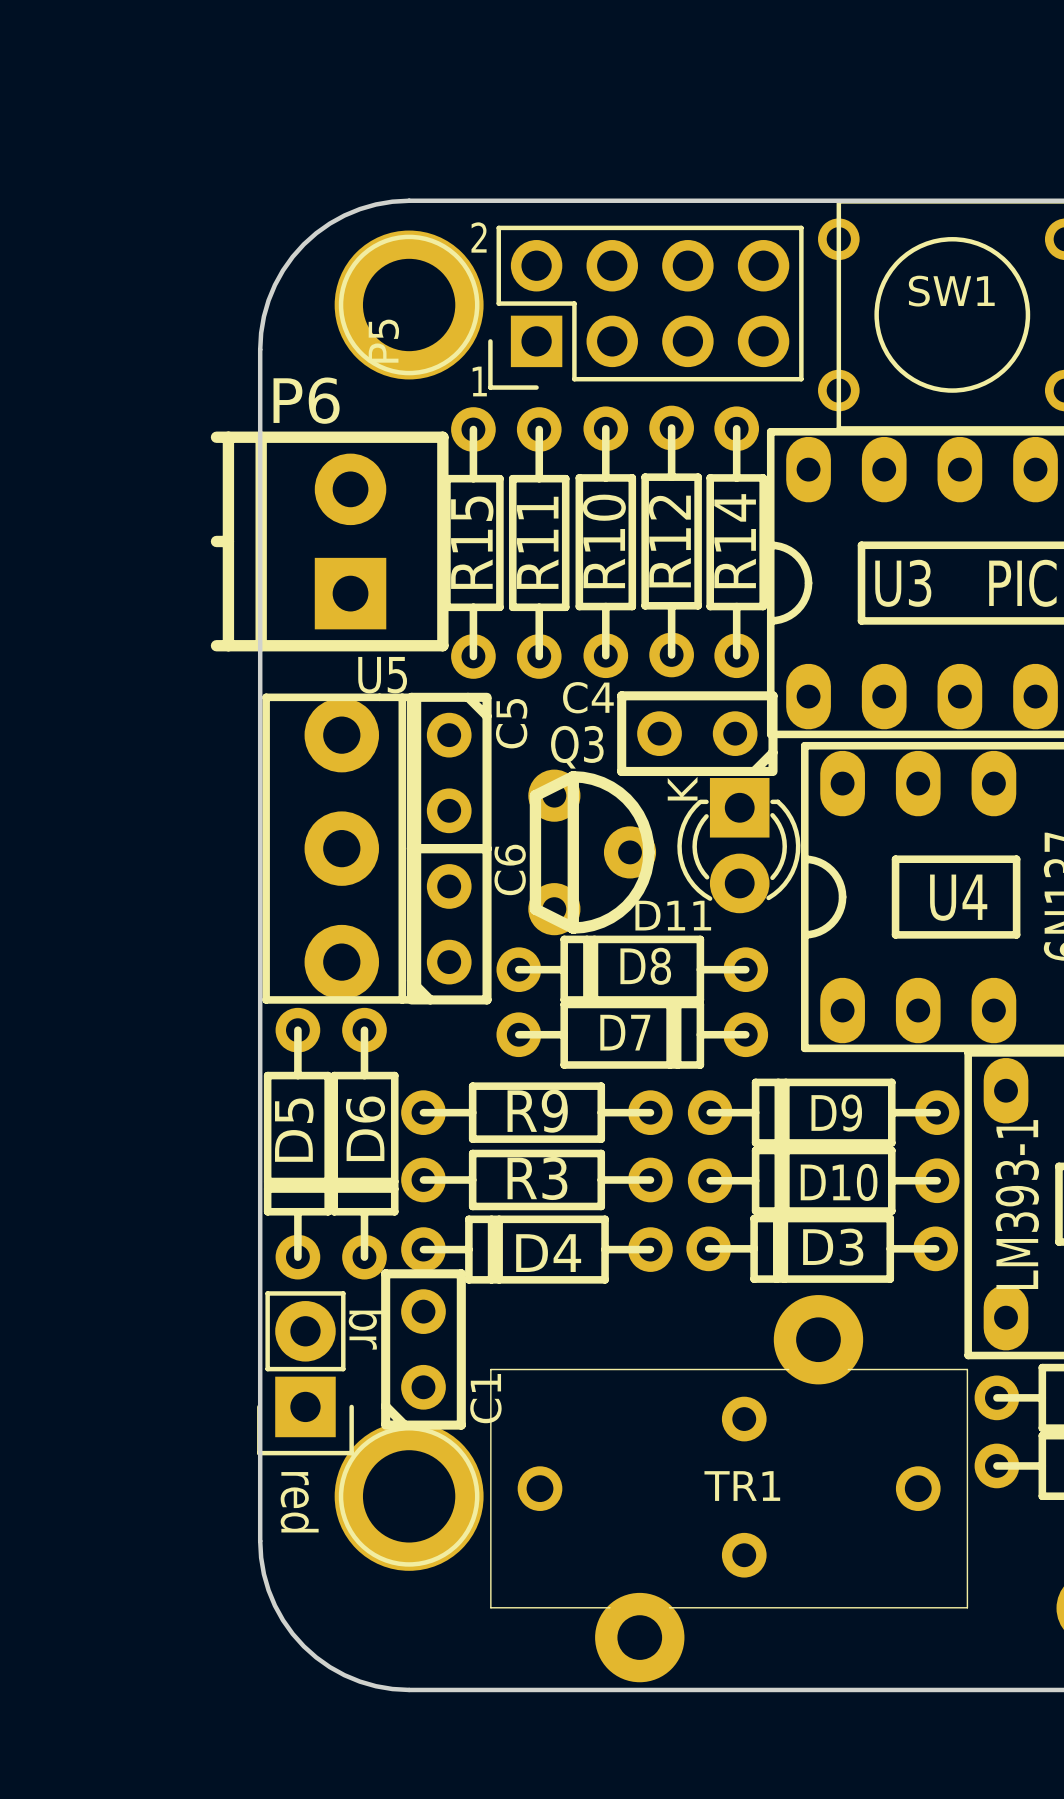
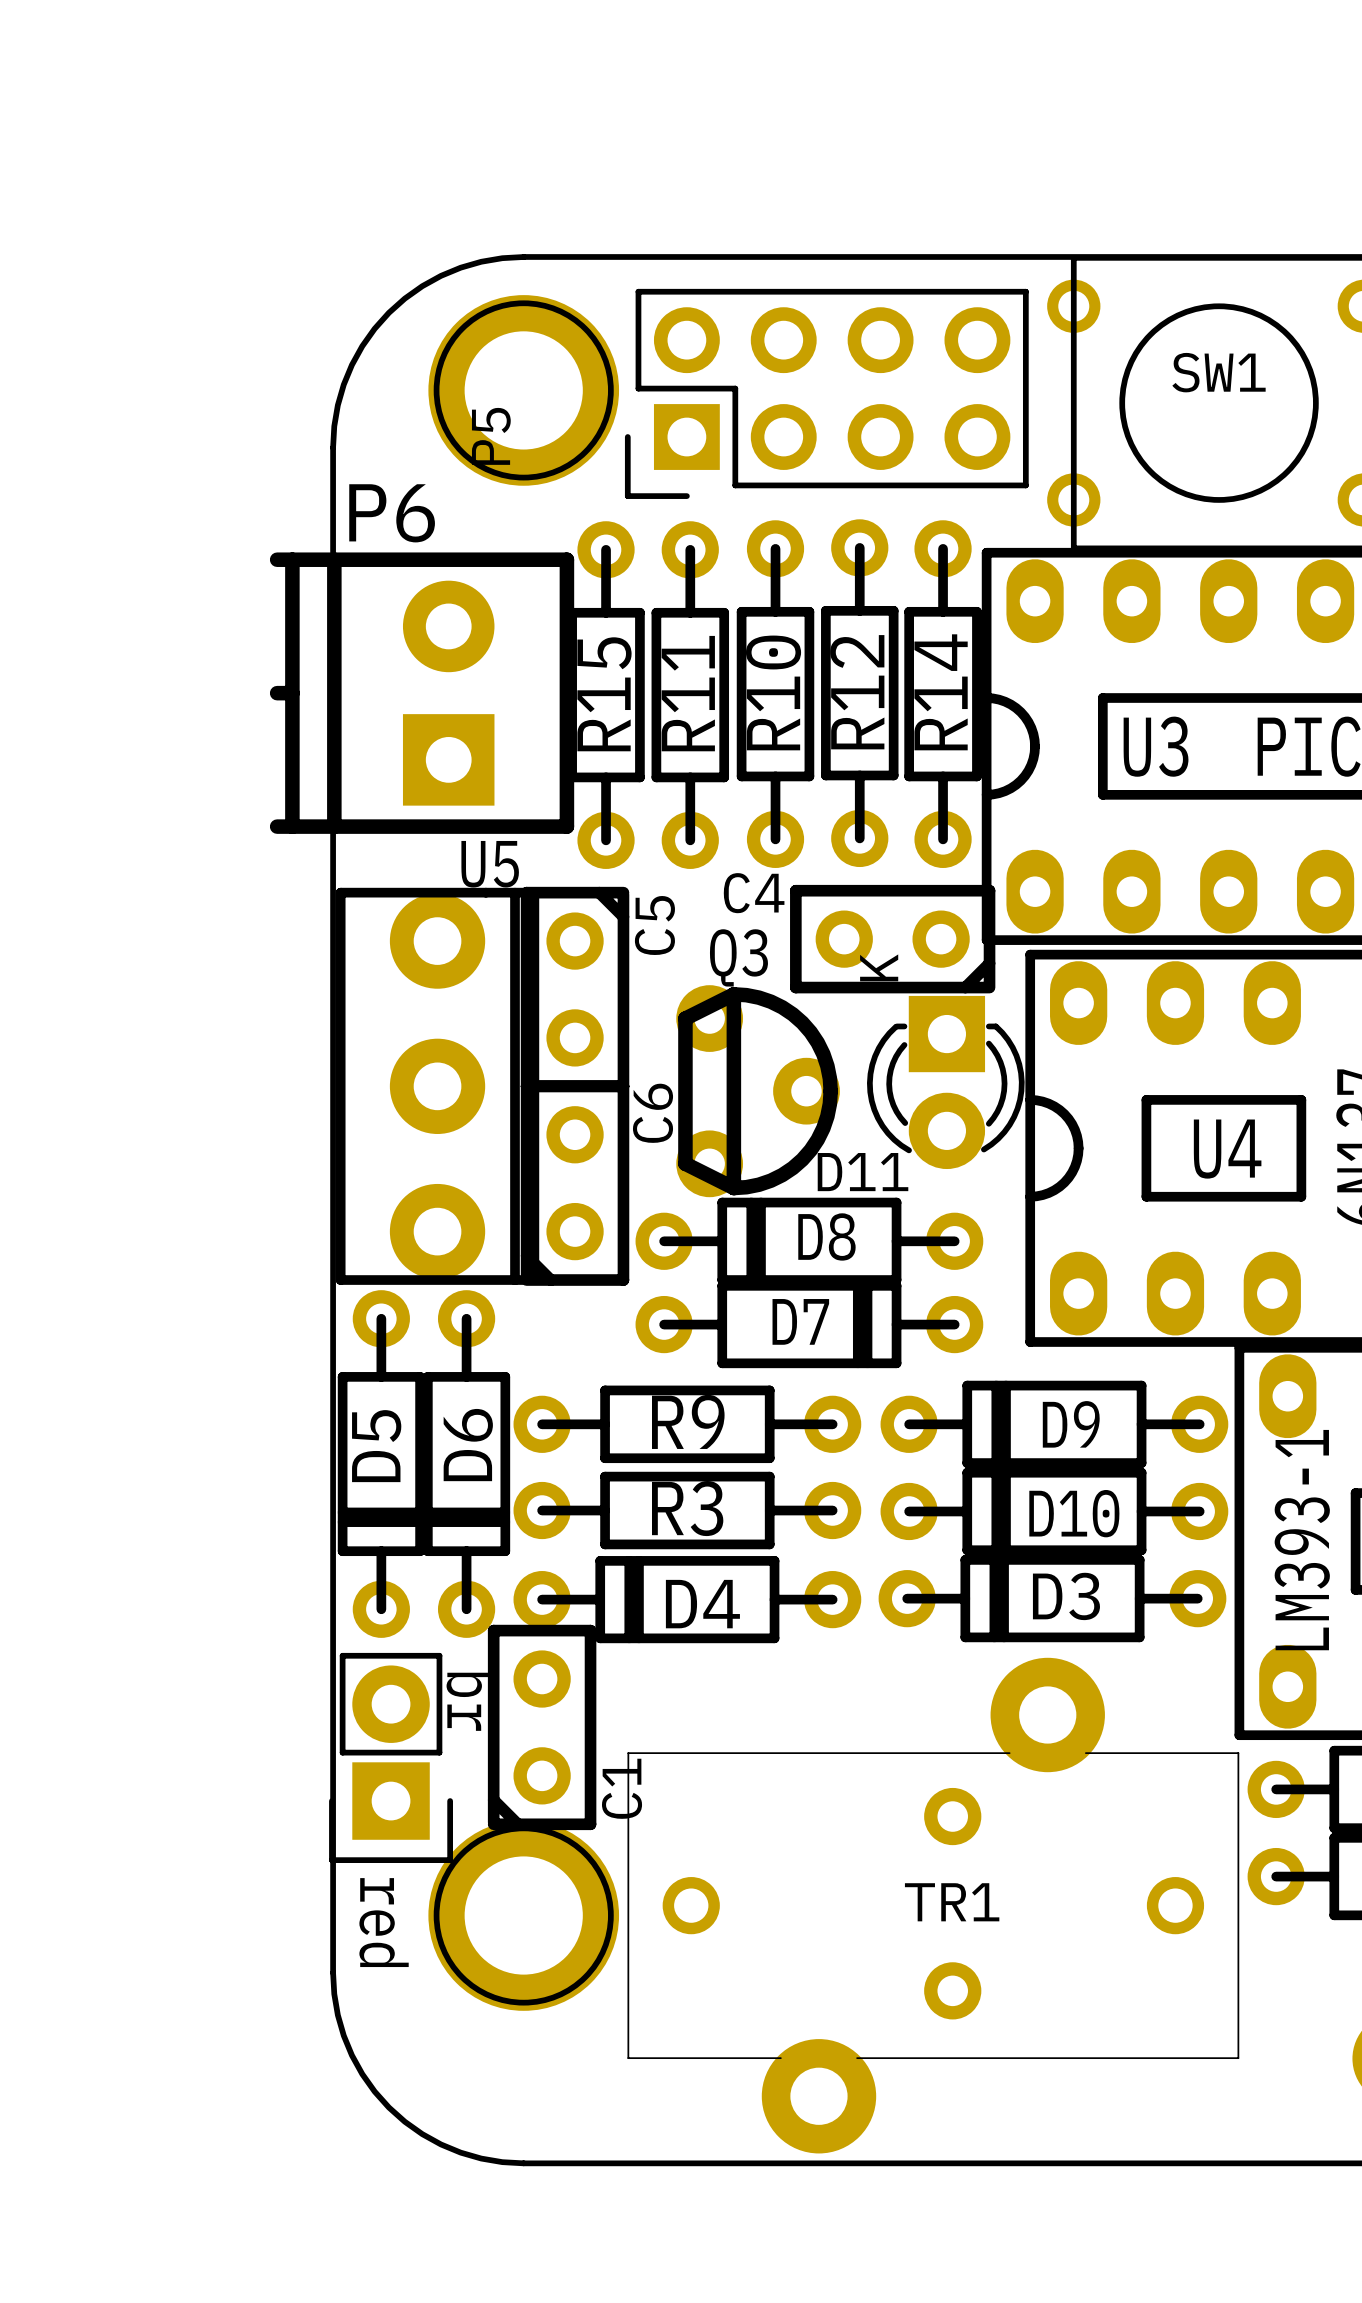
text: 2 (479, 237) -> none
text: 1 (479, 381) -> none
D11 text position: K (682, 788) -> K (879, 967)

